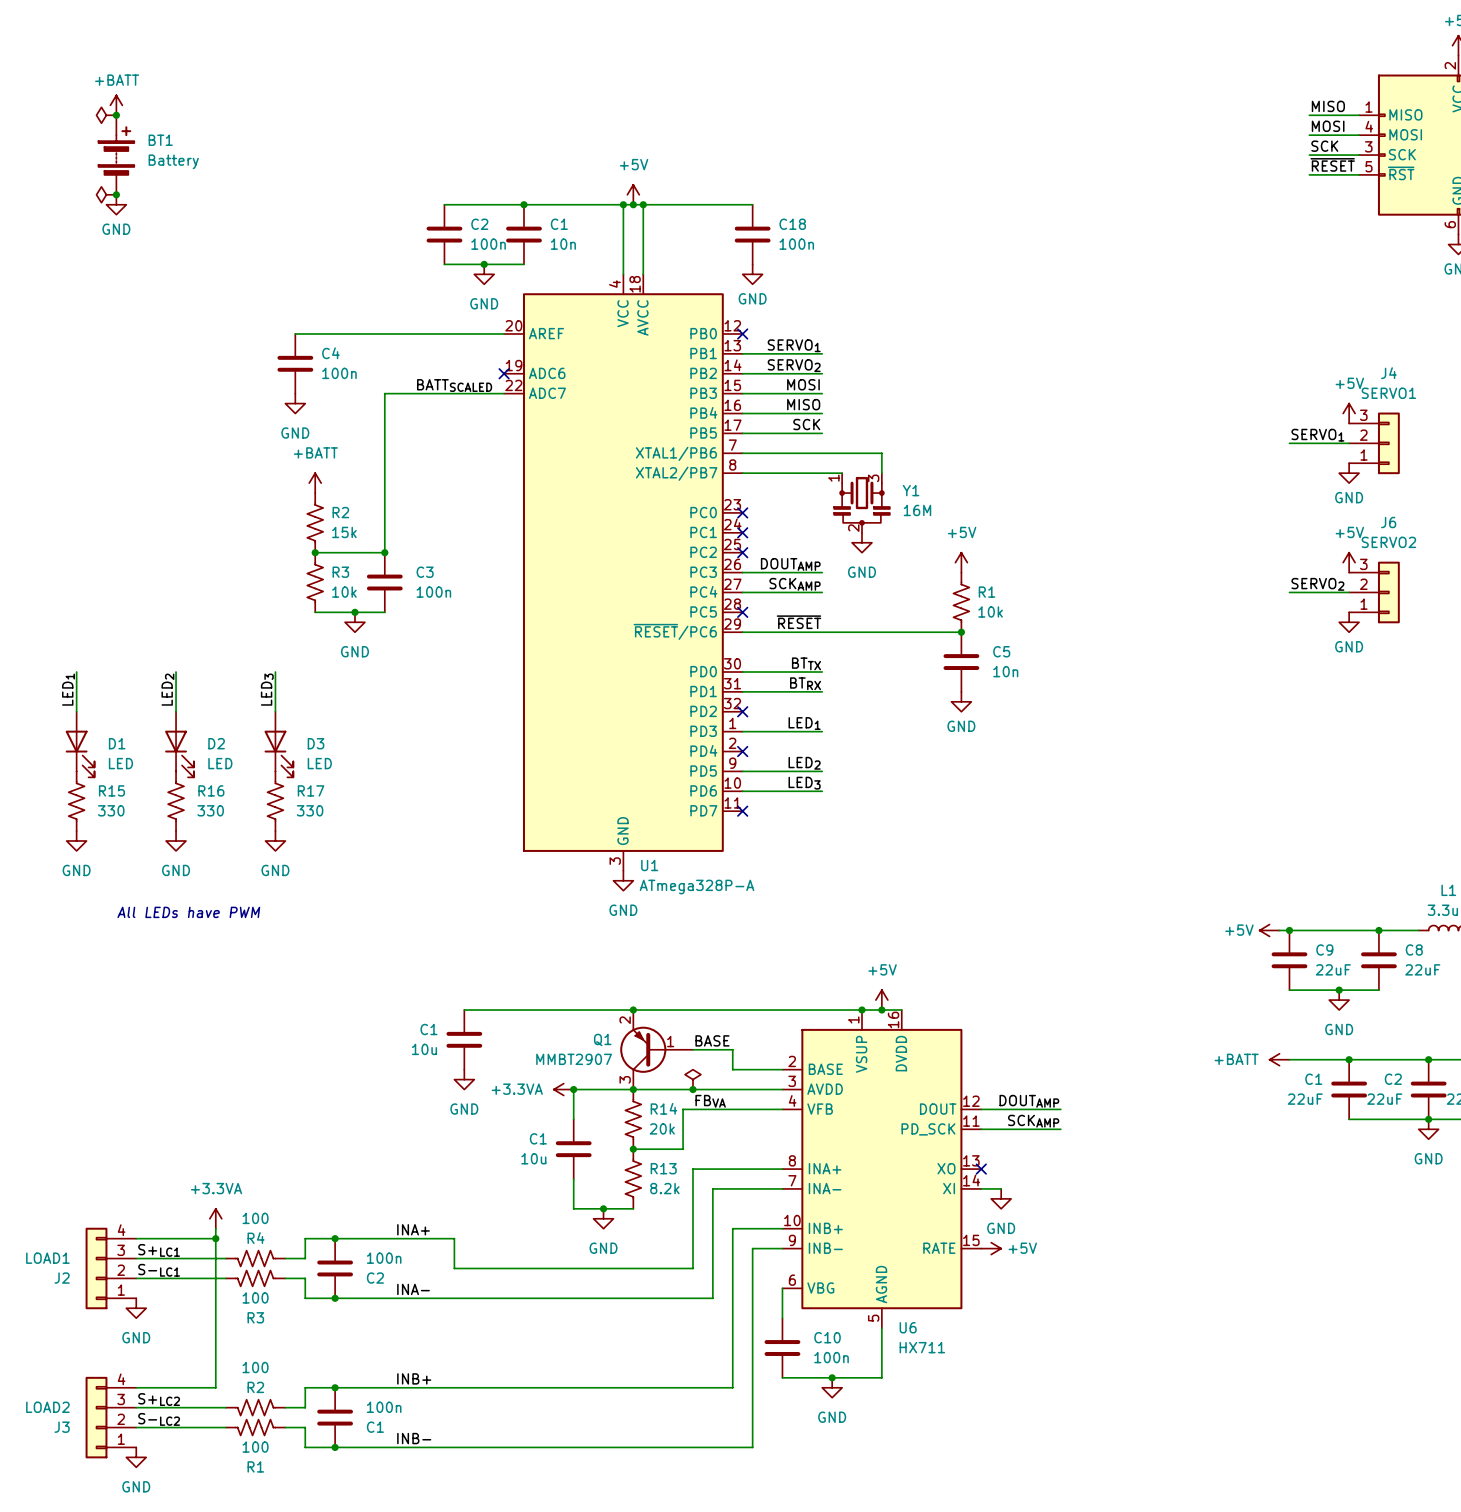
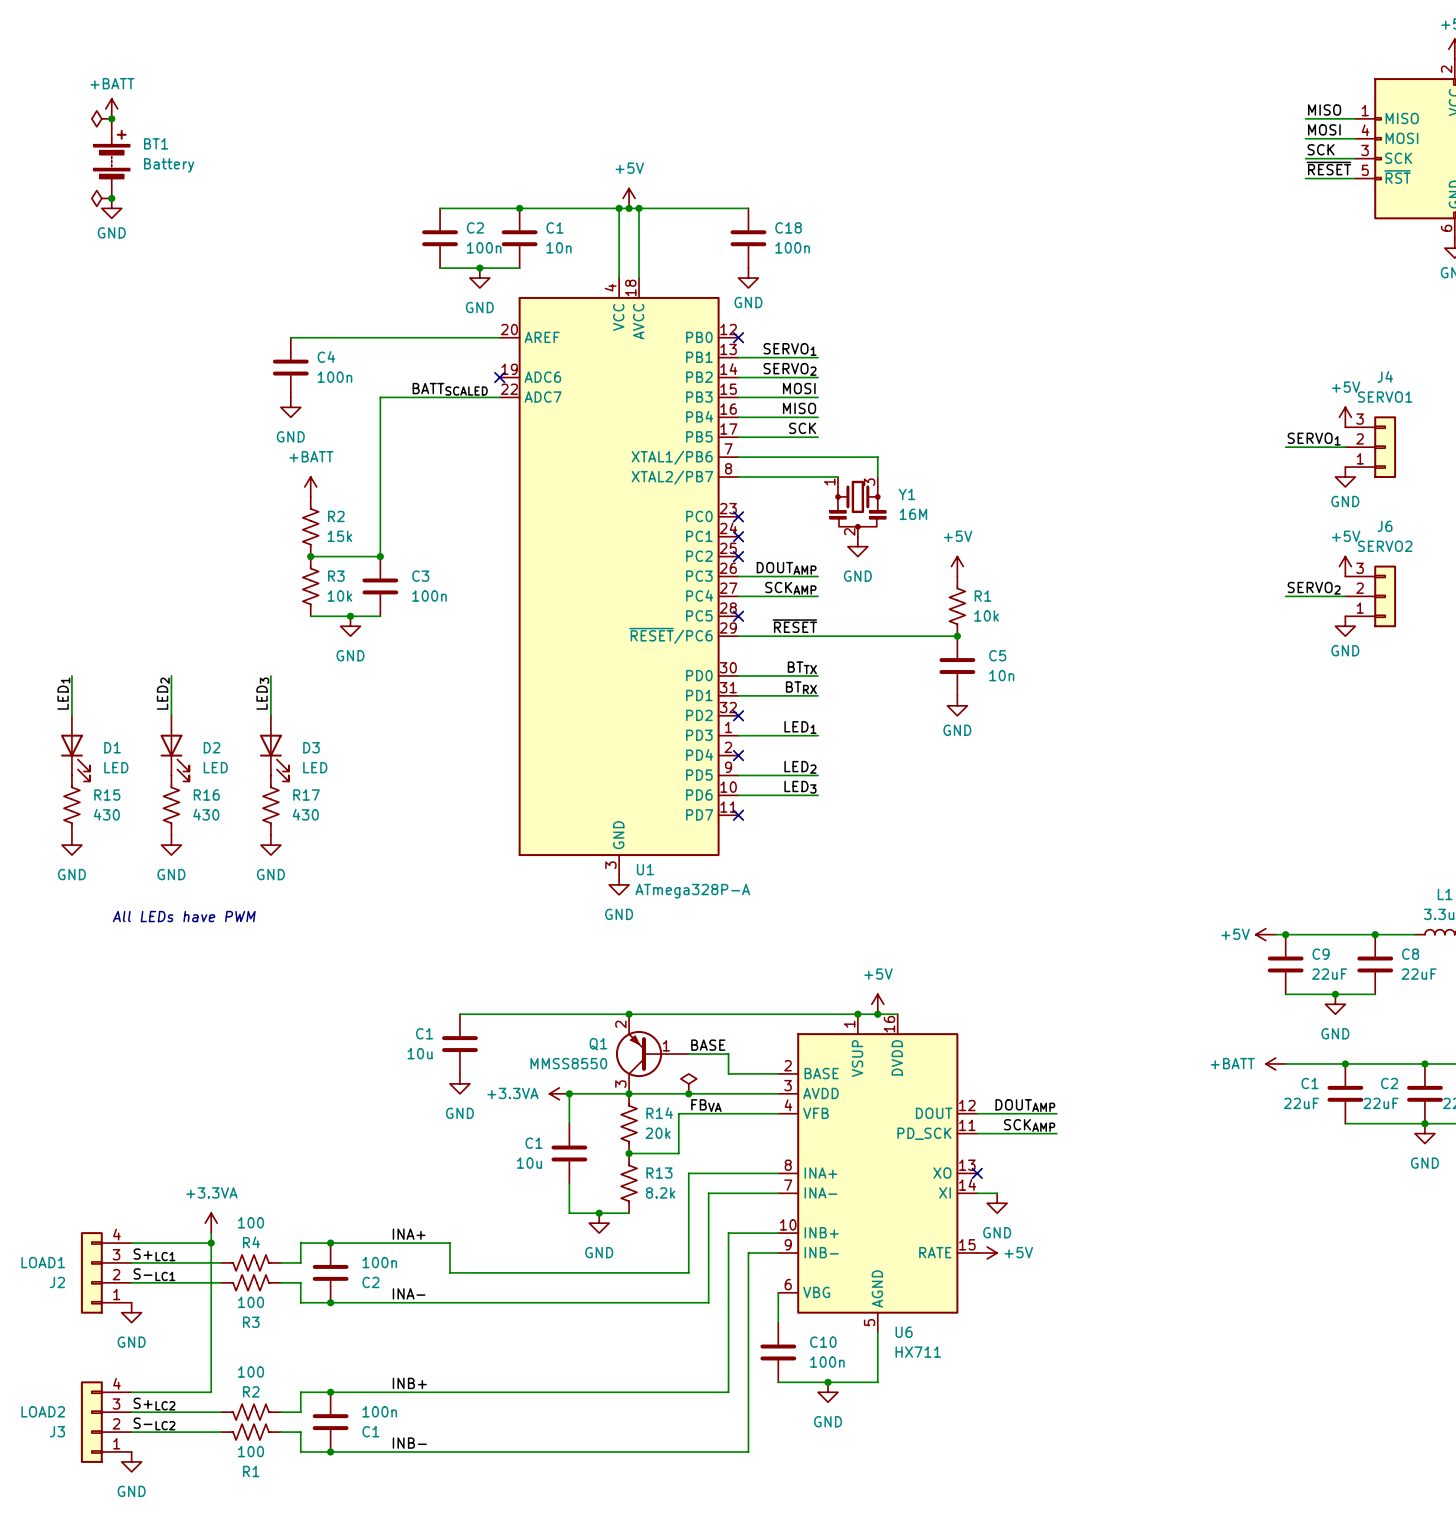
R15 value: 330 (111, 810) -> 430 (106, 814)
R16 value: 330 (210, 810) -> 430 (206, 814)
R17 value: 330 (310, 810) -> 430 (305, 814)
Q1 value: MMBT2907 (574, 1059) -> MMSS8550 (568, 1063)

